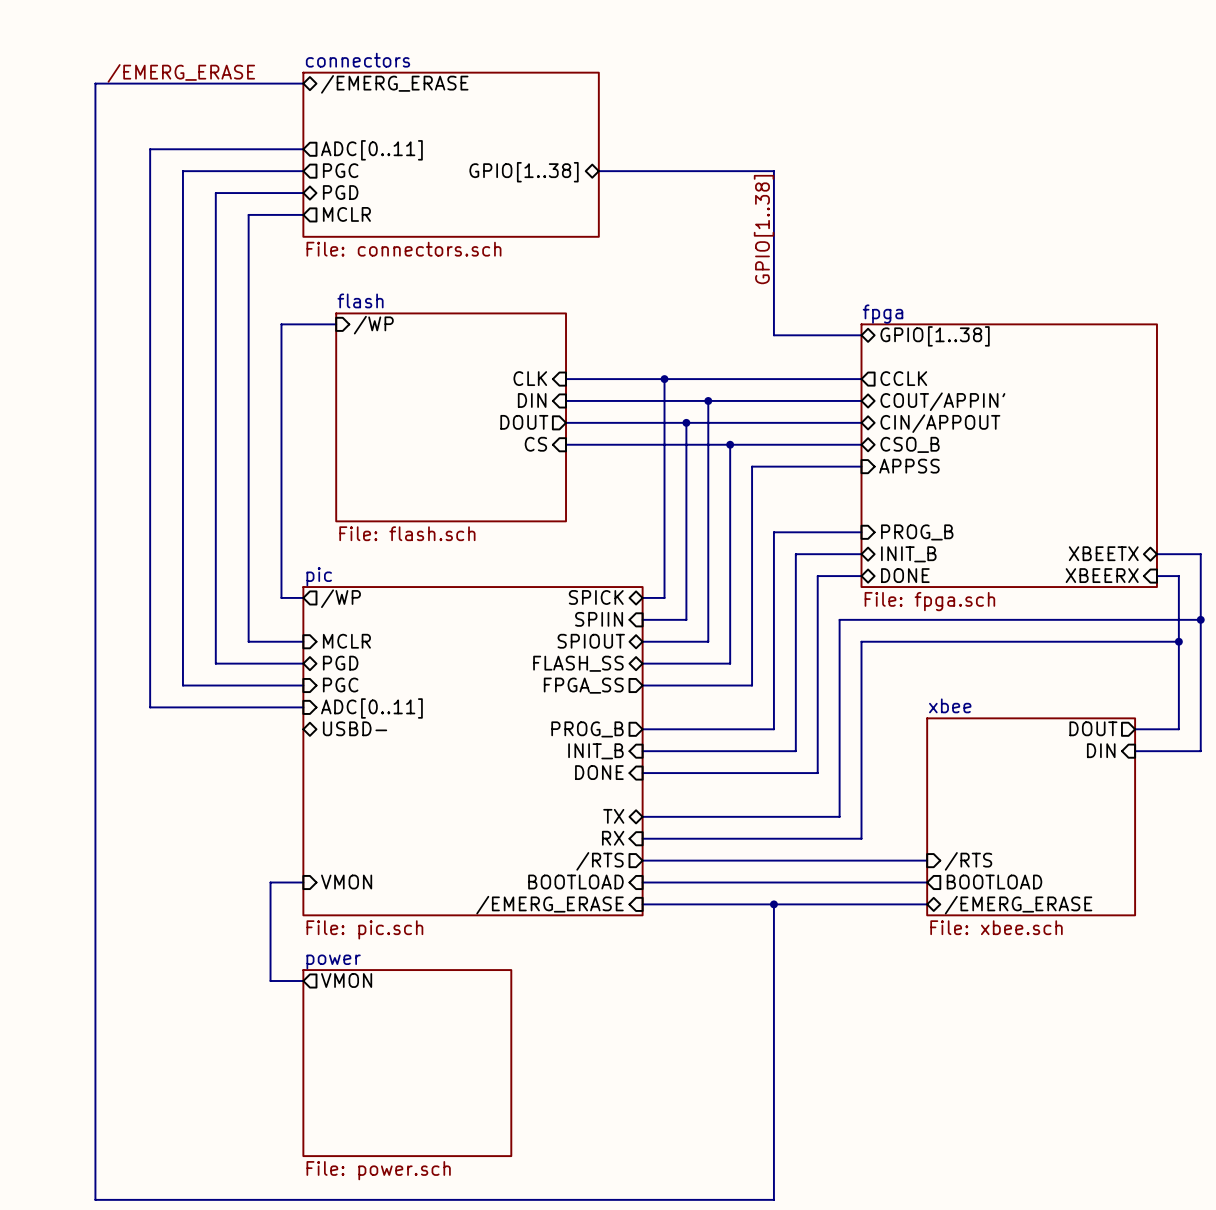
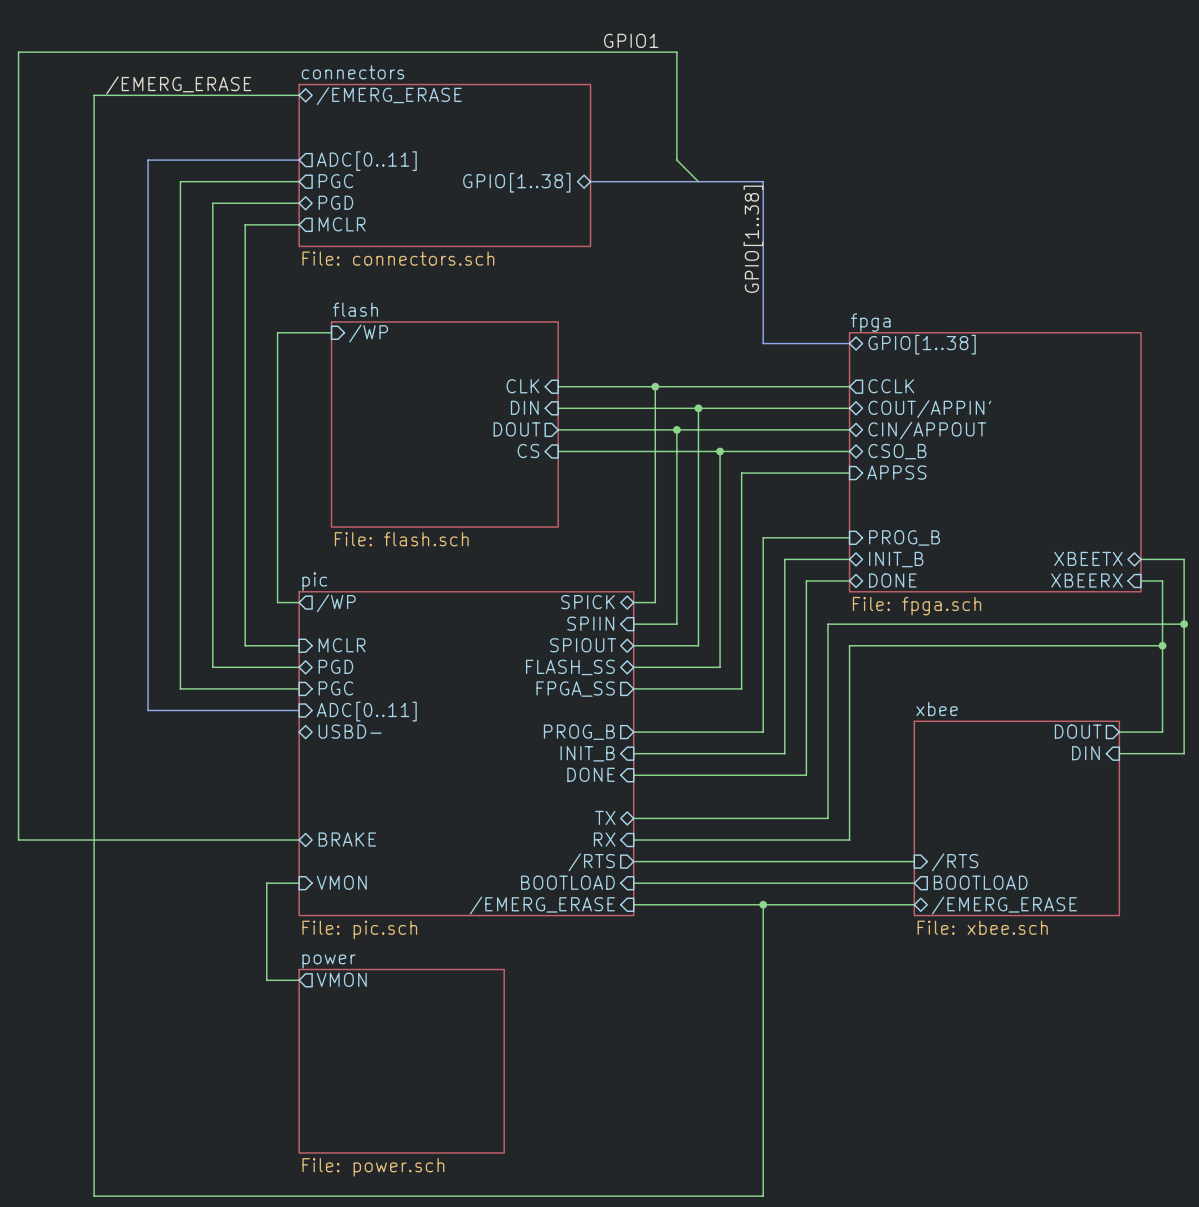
label: none -> GPIO1 (631, 40)
wire: none -> (698, 181) (676, 160) (676, 52) (18, 52) (18, 840) (299, 840)
sheet pin: none -> BRAKE (347, 839)

